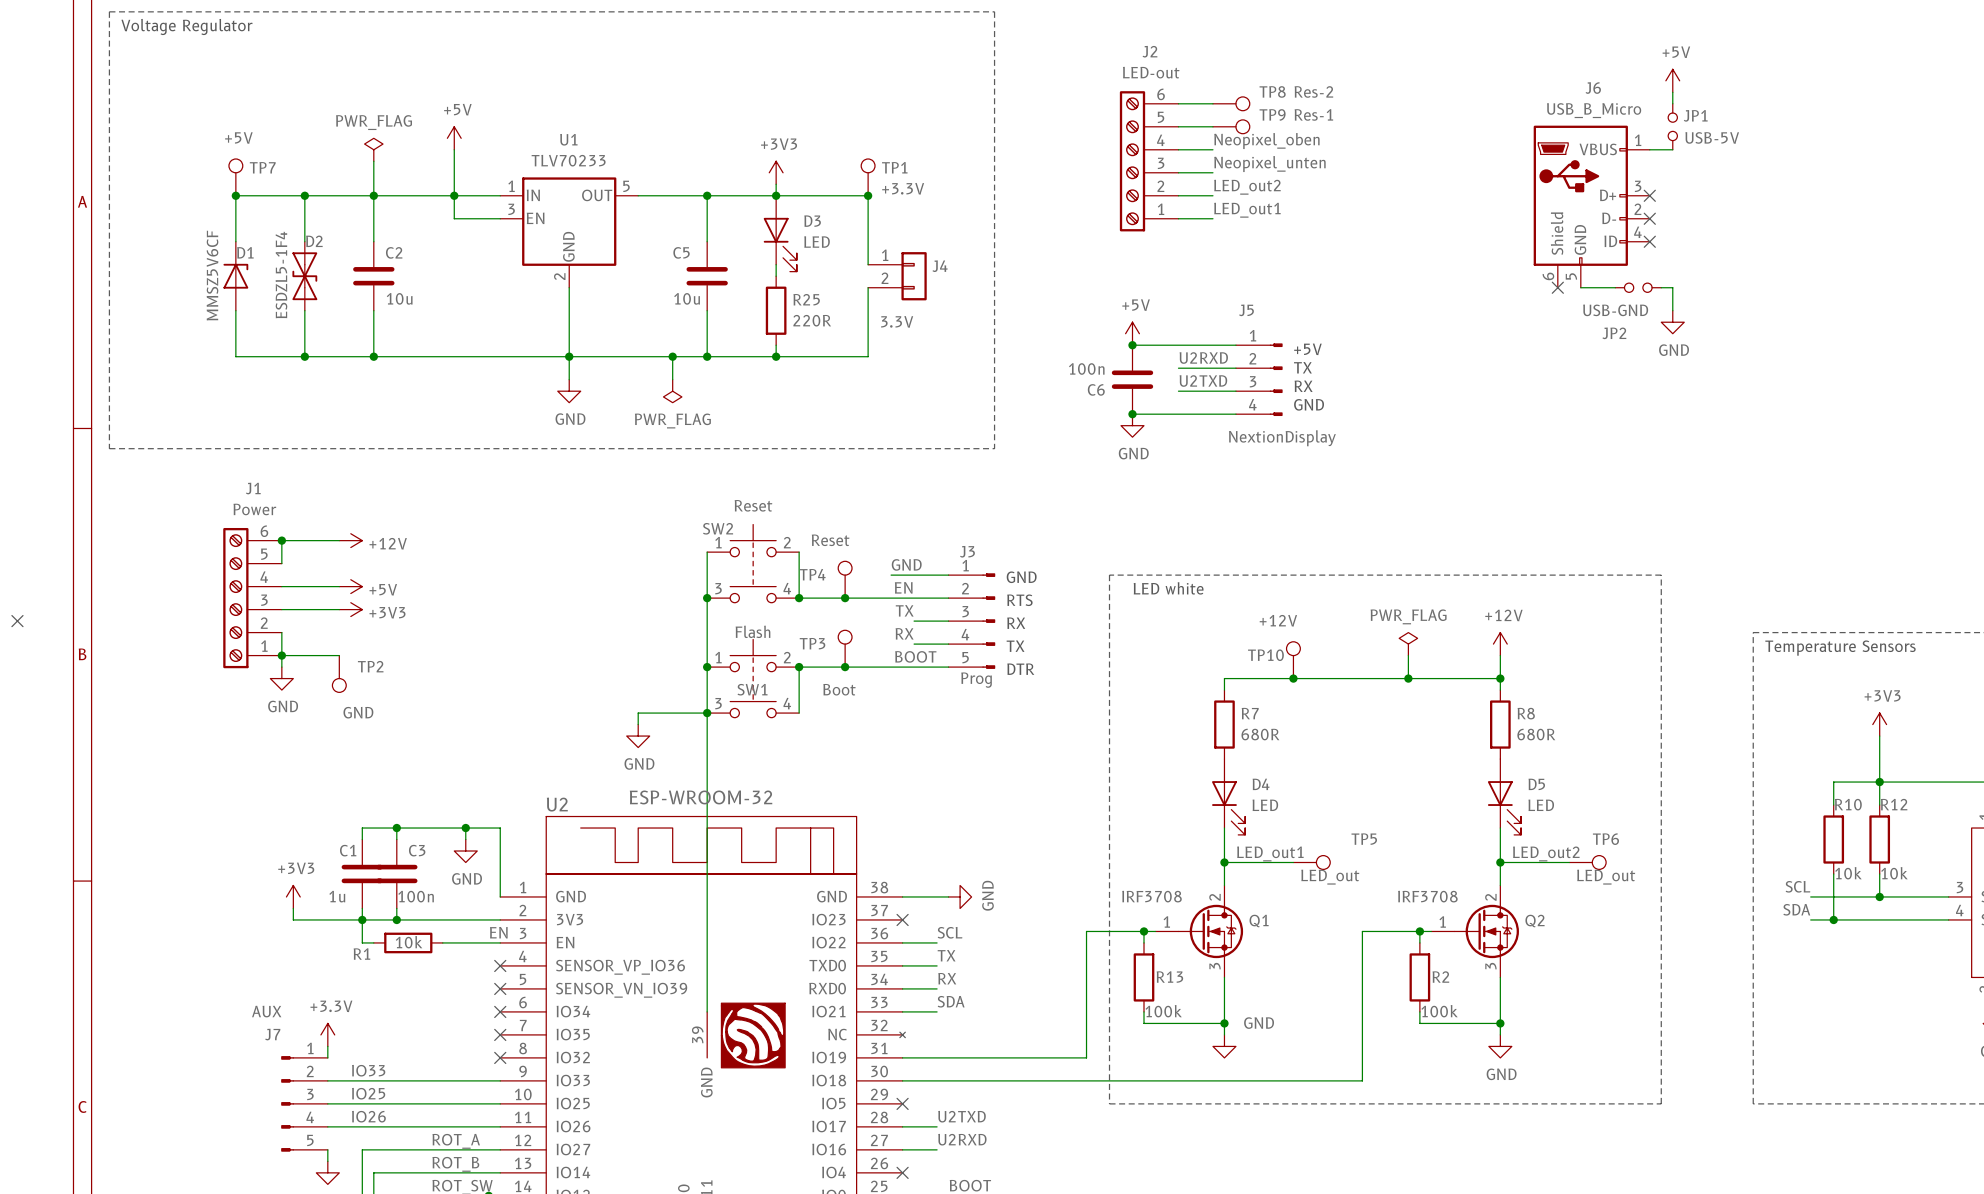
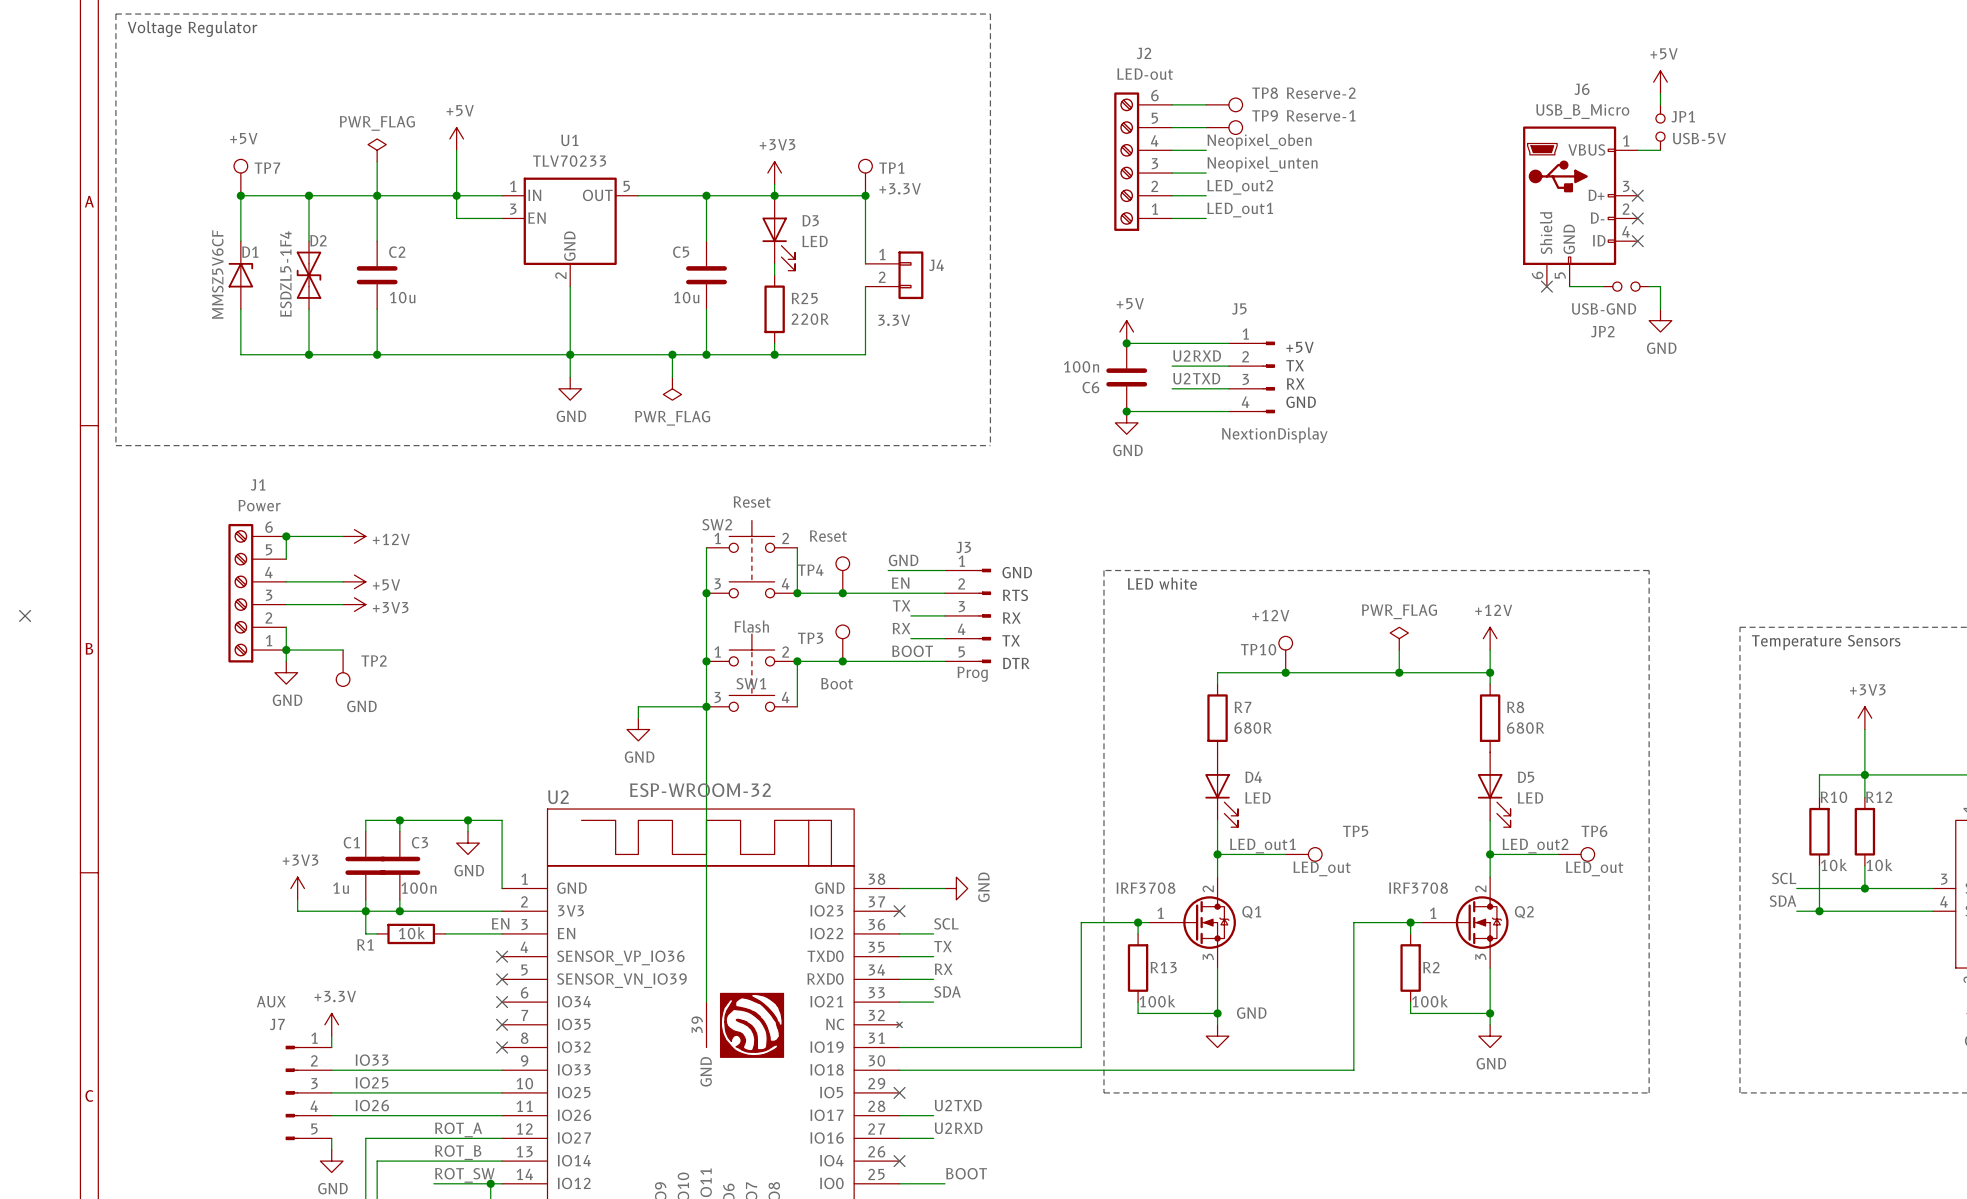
TP8 value: Res-2 (1313, 91) -> Reserve-2 (1321, 93)
TP9 value: Res-1 (1313, 114) -> Reserve-1 (1321, 115)

